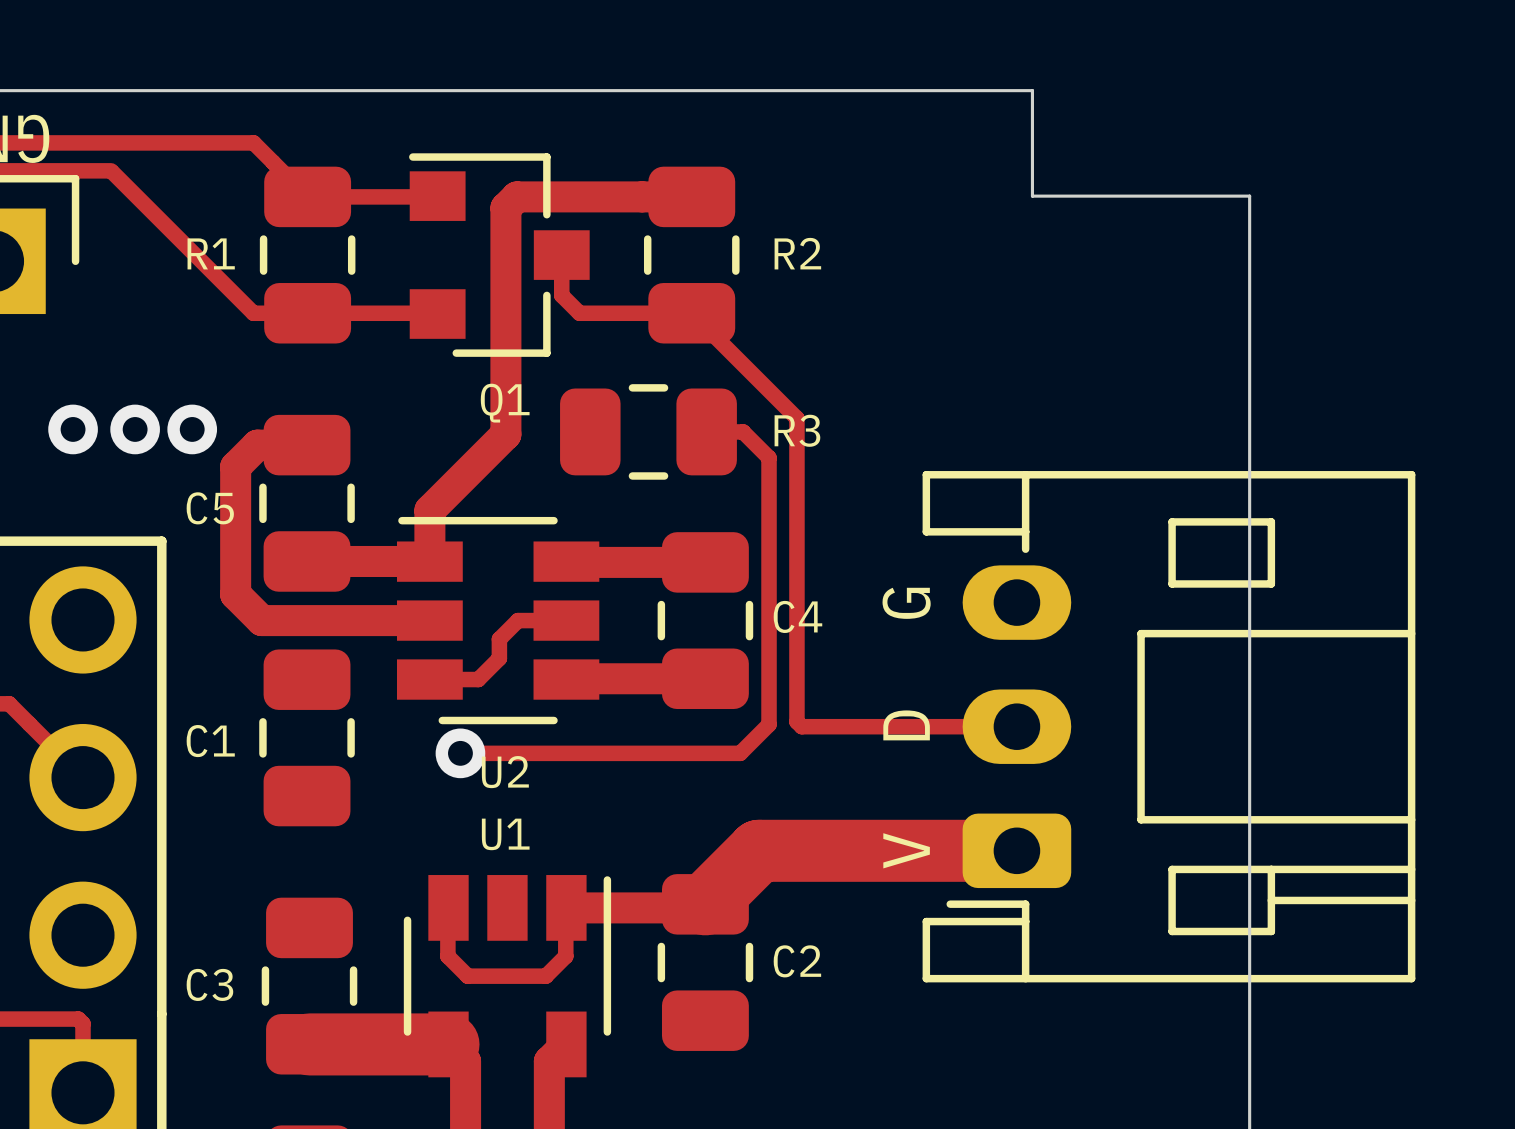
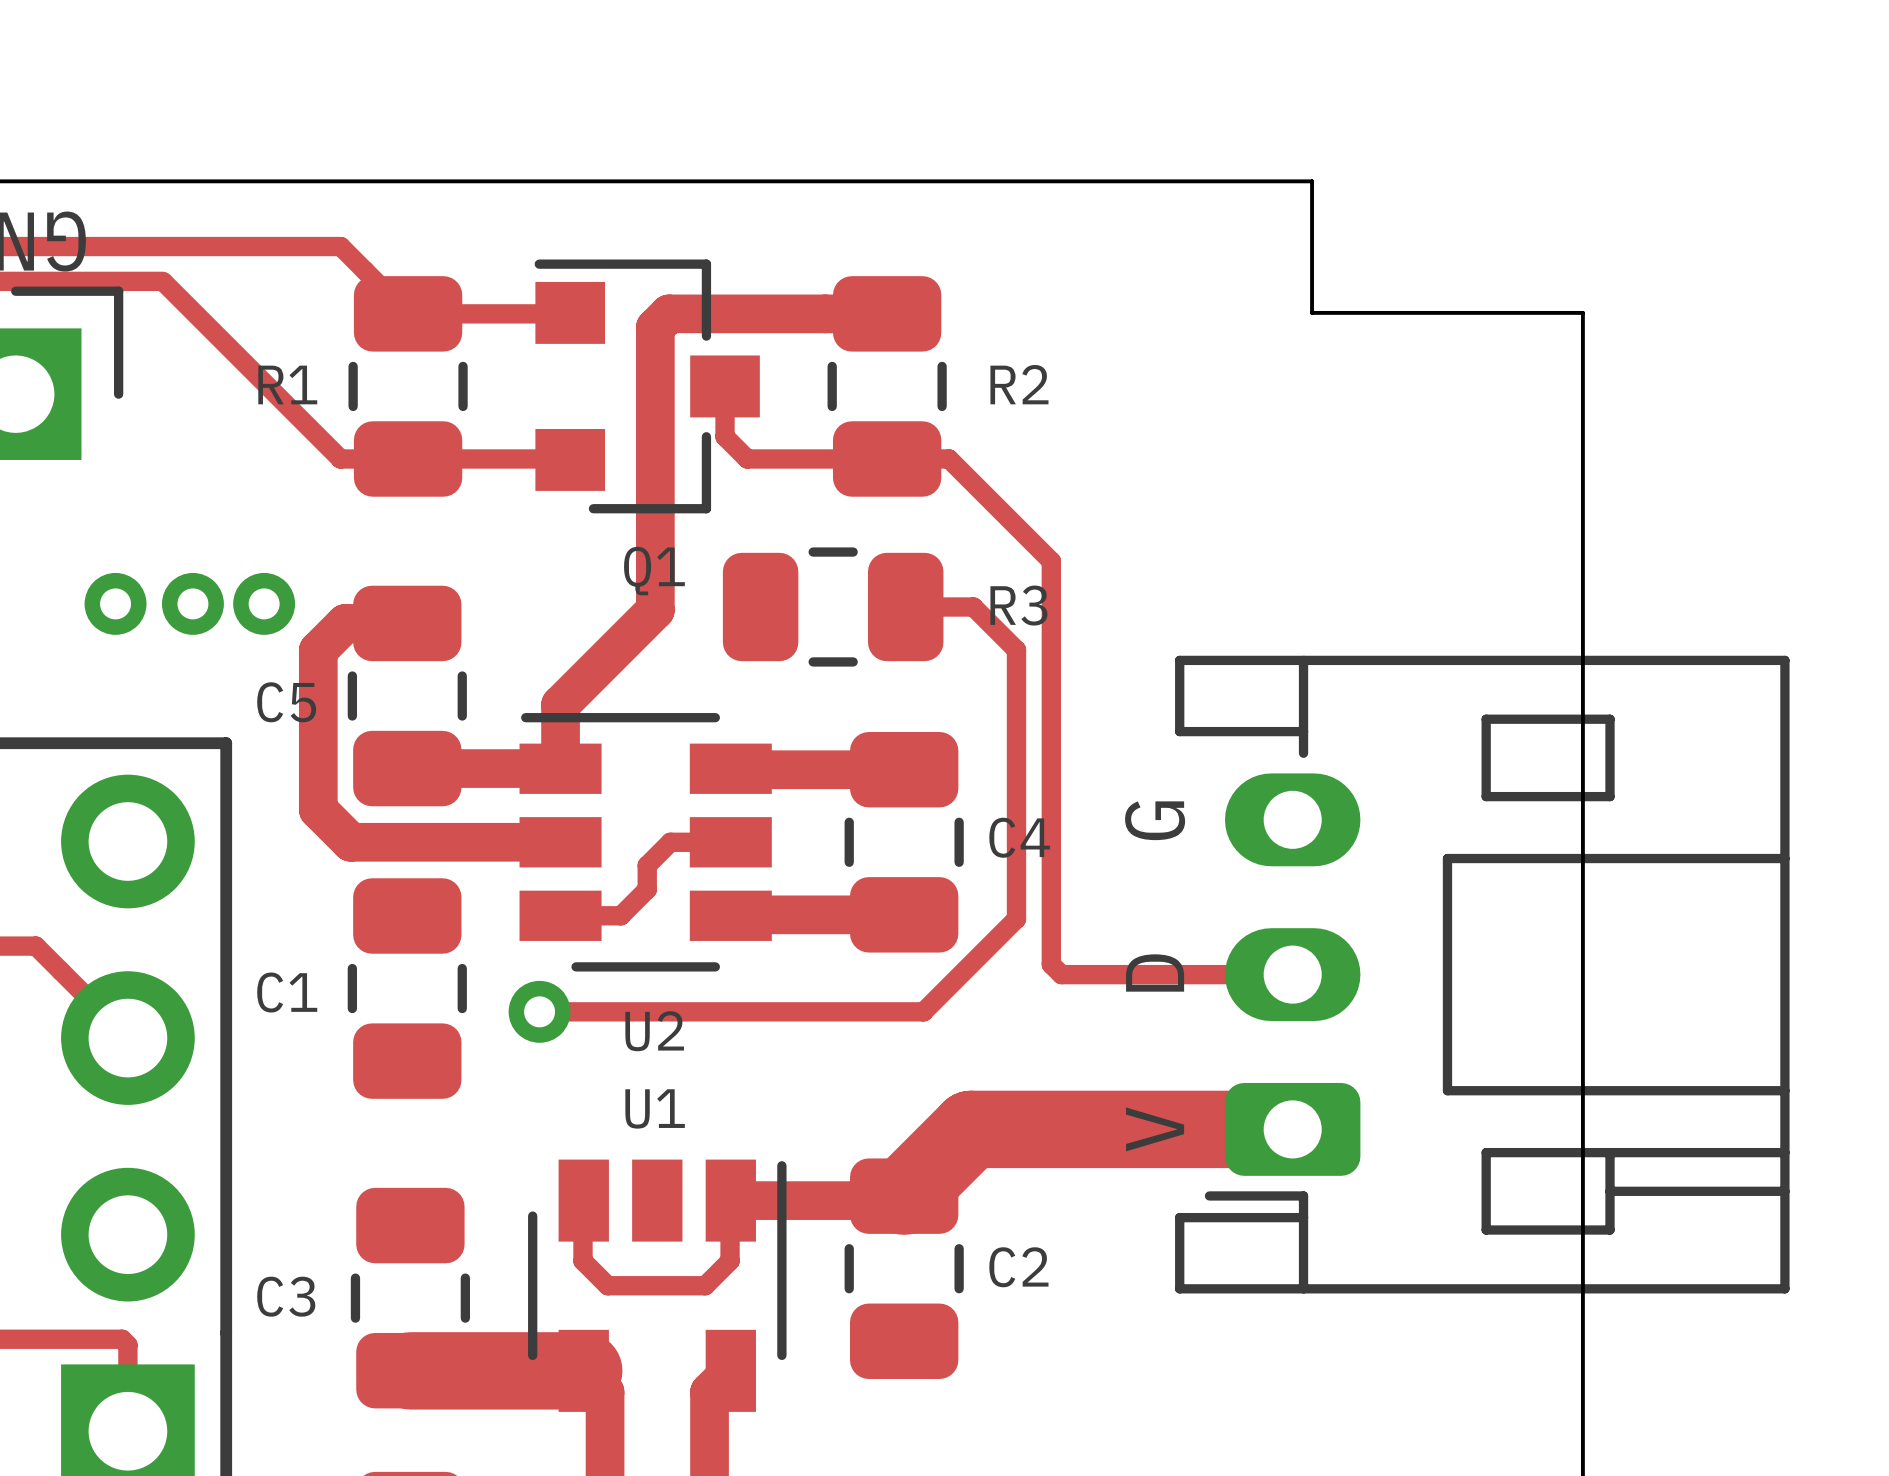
track: (691, 313) (796, 418) (796, 721) (801, 726) (831, 726) -> (887, 458) (949, 458) (1051, 561) (1051, 964) (1061, 974)
track: (743, 431) (769, 457) (769, 724) (740, 753) (460, 753) -> (951, 607) (973, 607) (1016, 650) (1016, 918) (923, 1011) (539, 1011)
via position: (460, 753) -> (539, 1011)

